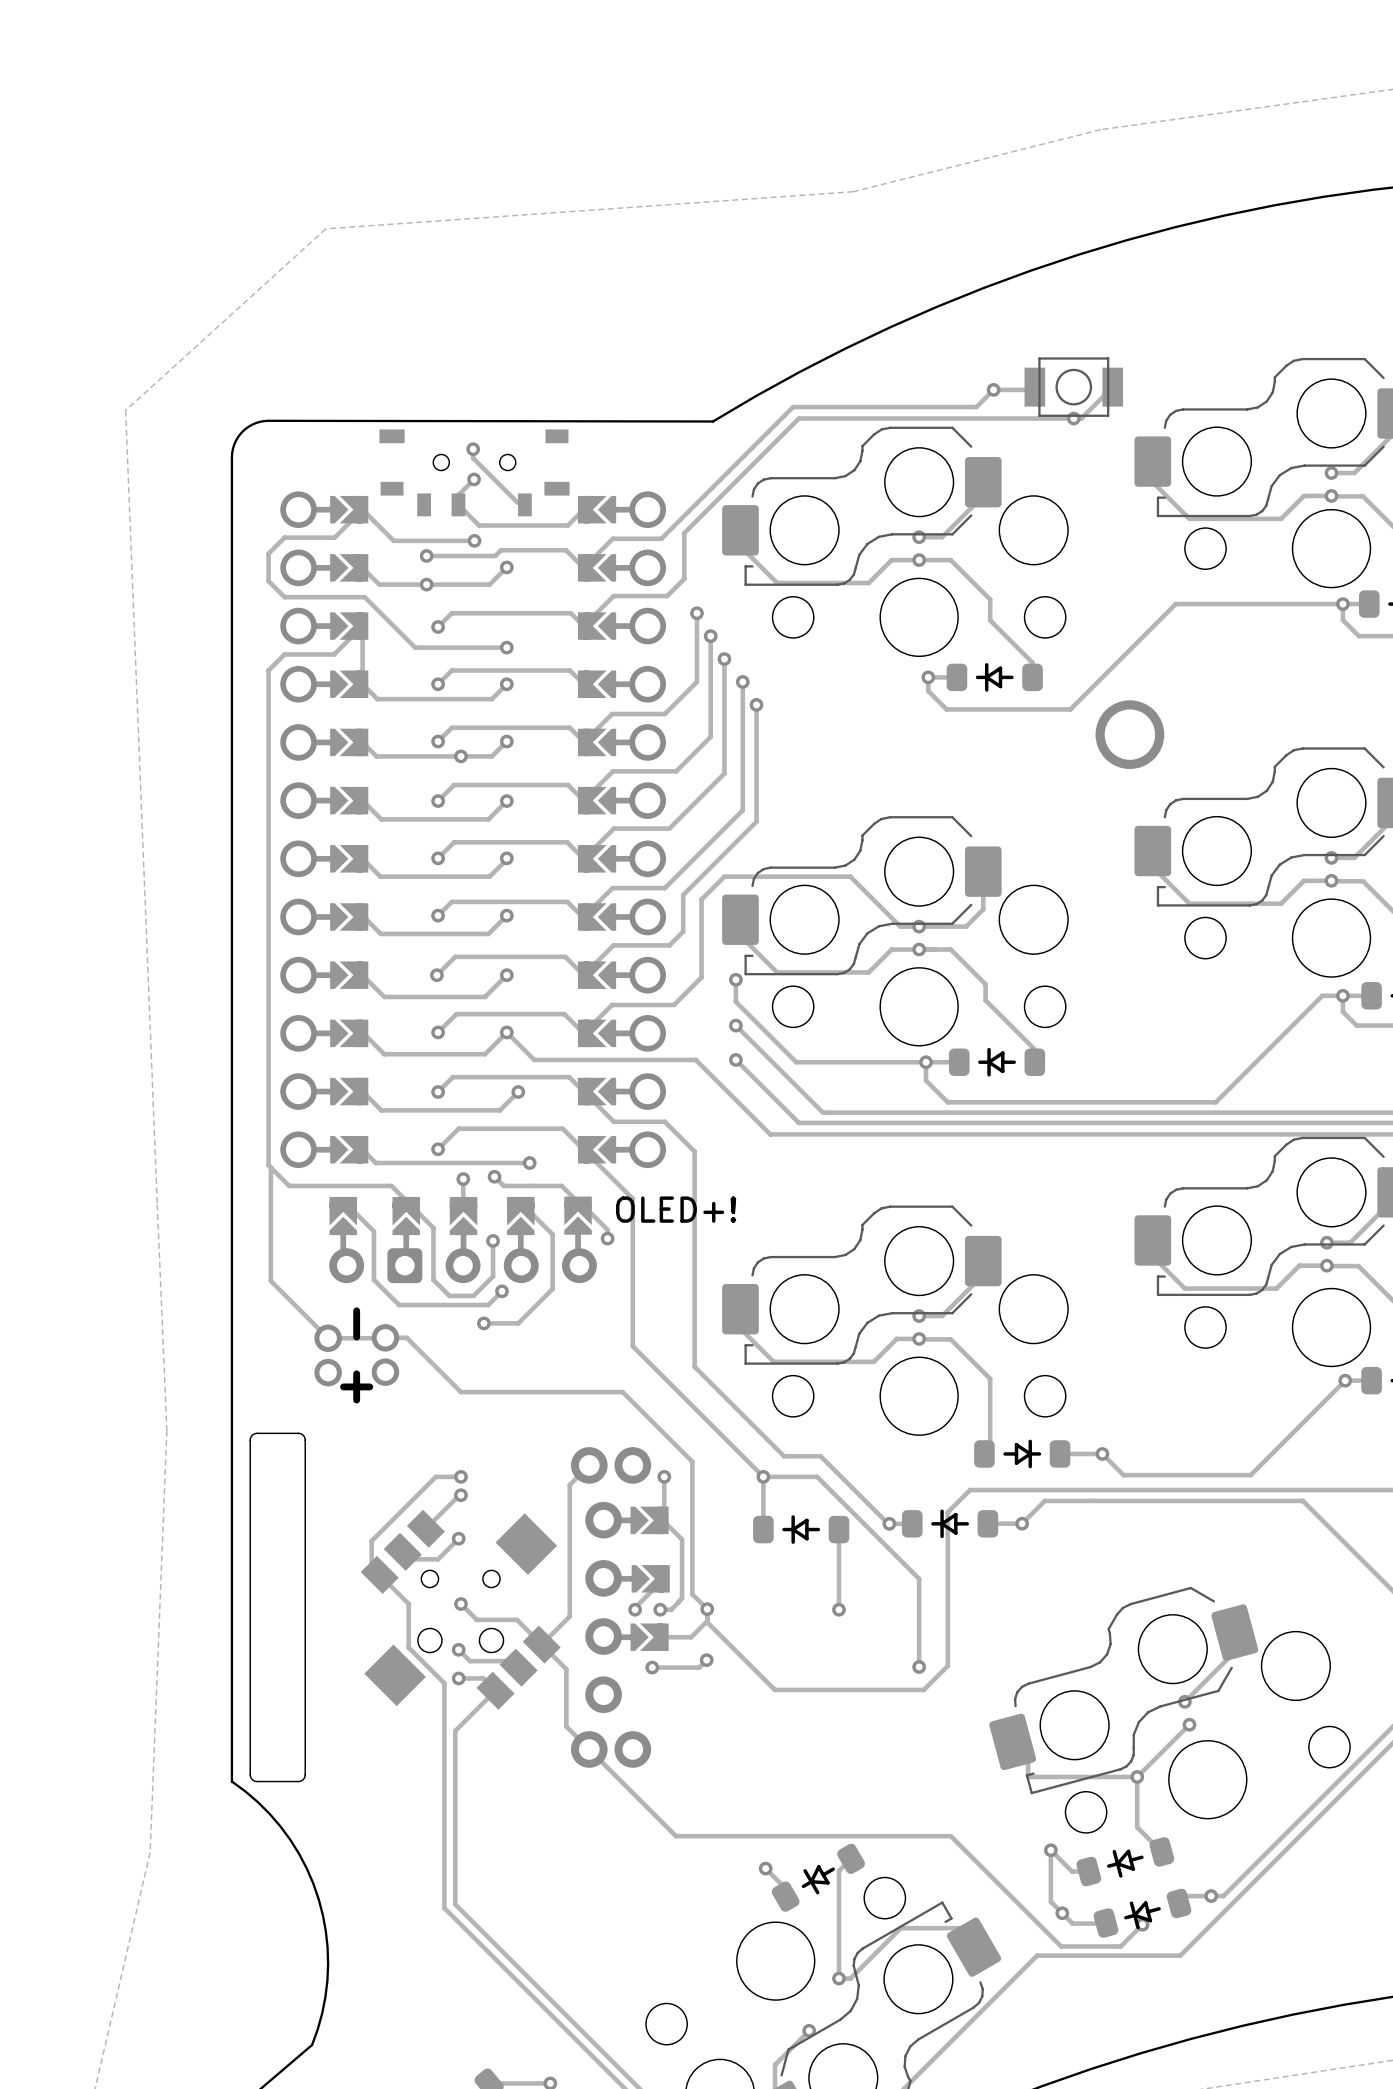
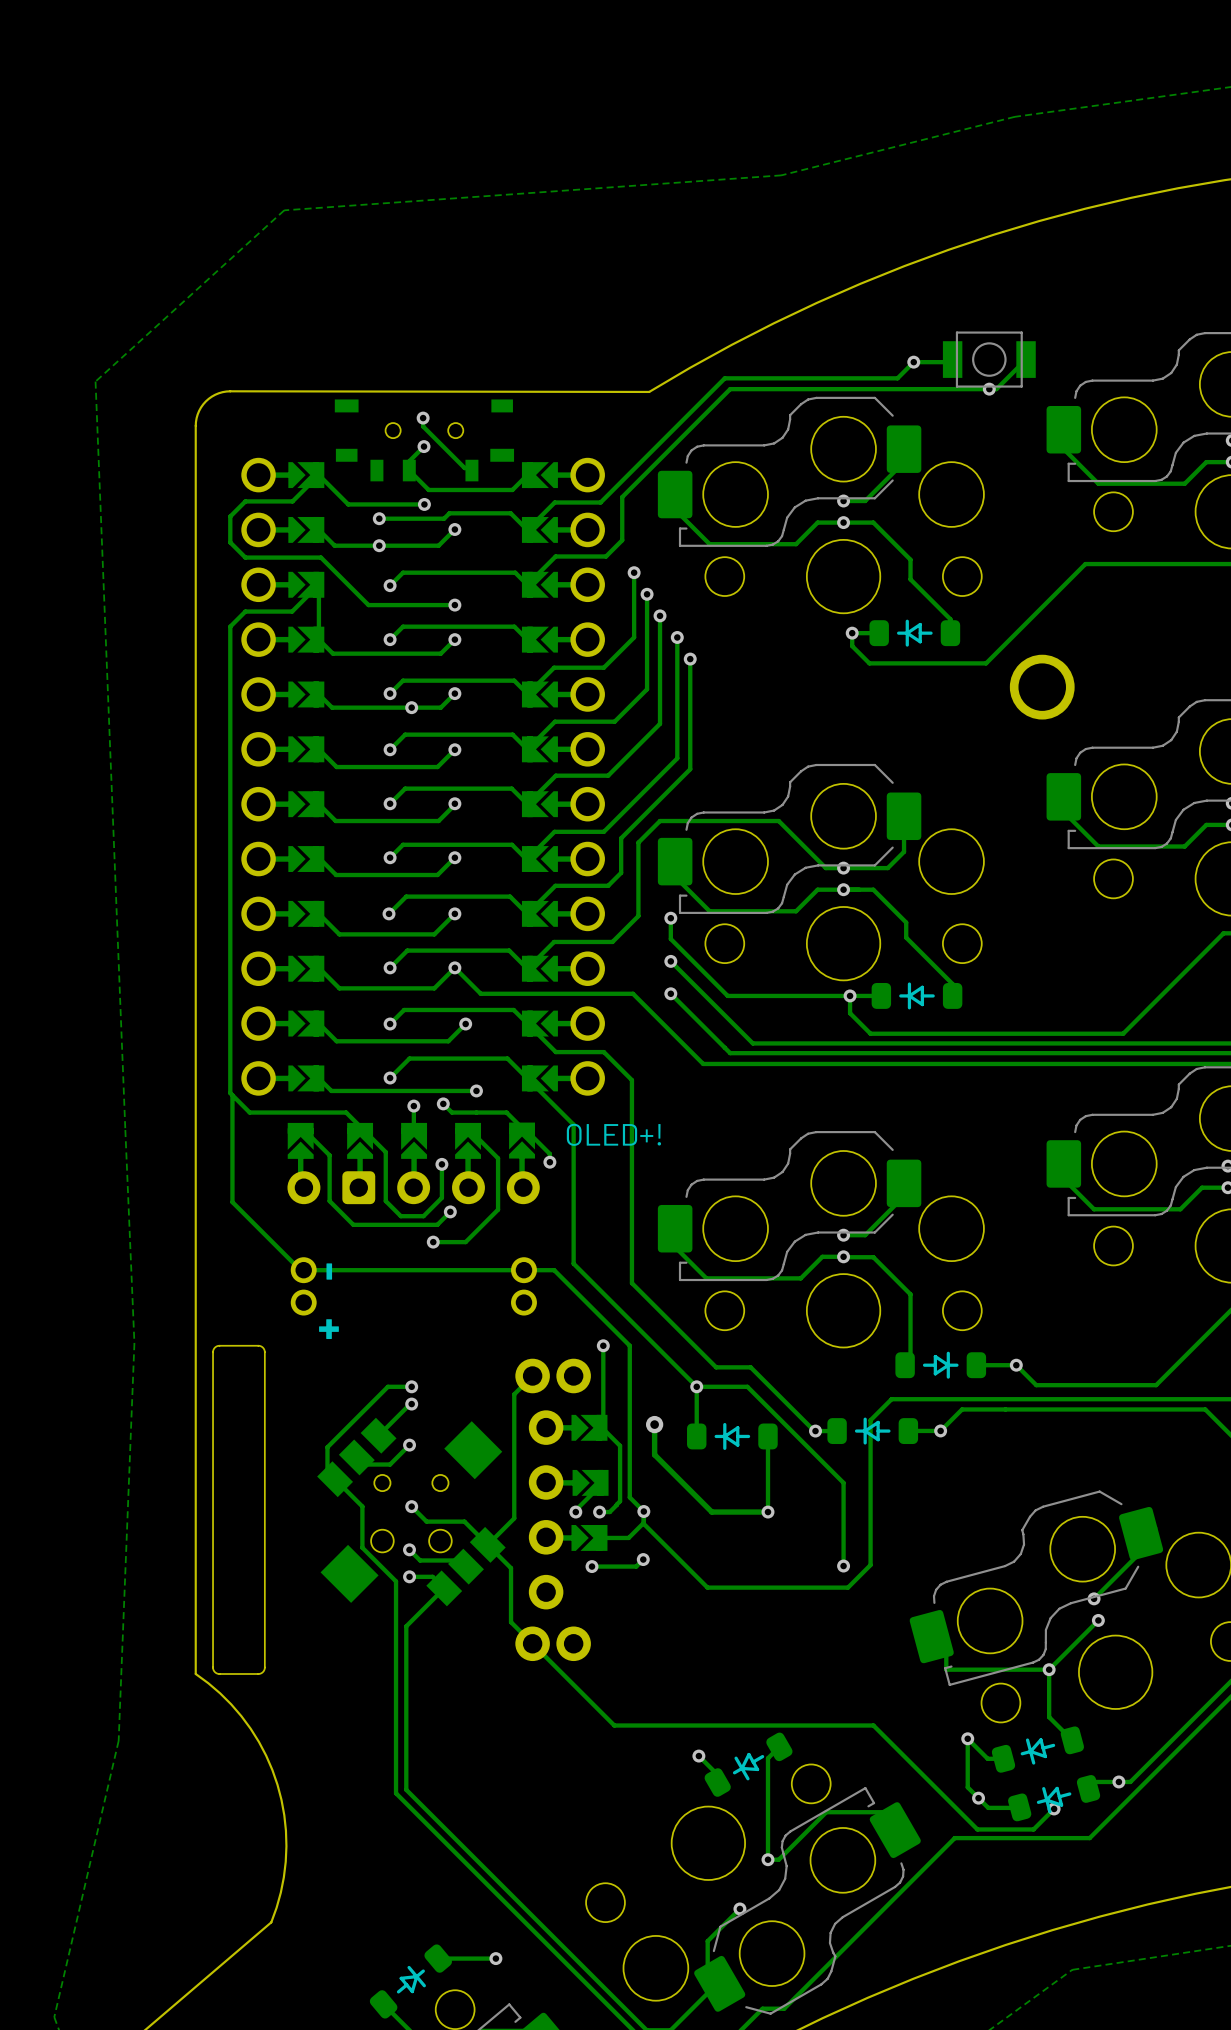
track: (328, 1338) (406, 1337) (461, 1392) (622, 1392) (692, 1461) -> (286, 1256) (300, 1270) (554, 1270) (629, 1345) (629, 1372)
part side: bottom (328, 1355) -> top (523, 1286)
part side: top (385, 1355) -> bottom (303, 1286)
track: none -> (603, 1345) (603, 1386)
via position: (664, 1476) -> (603, 1345)
track: none -> (654, 1424) (654, 1454) (711, 1512) (767, 1512)
via: none -> (654, 1424)

